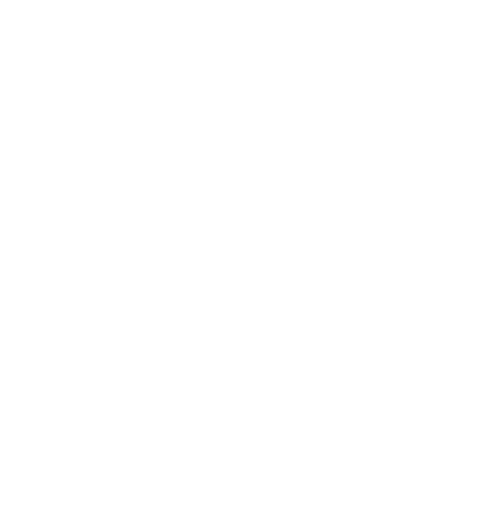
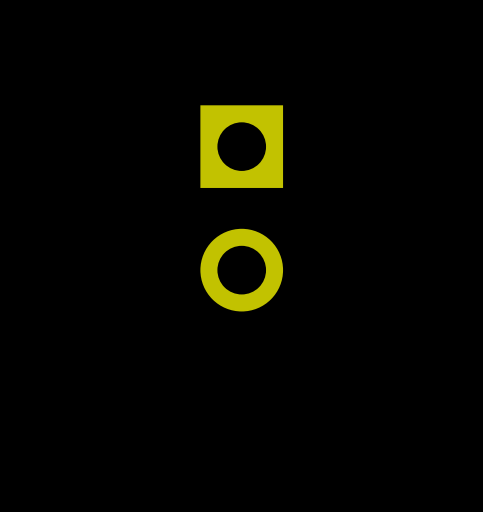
part: none -> (241, 208)

